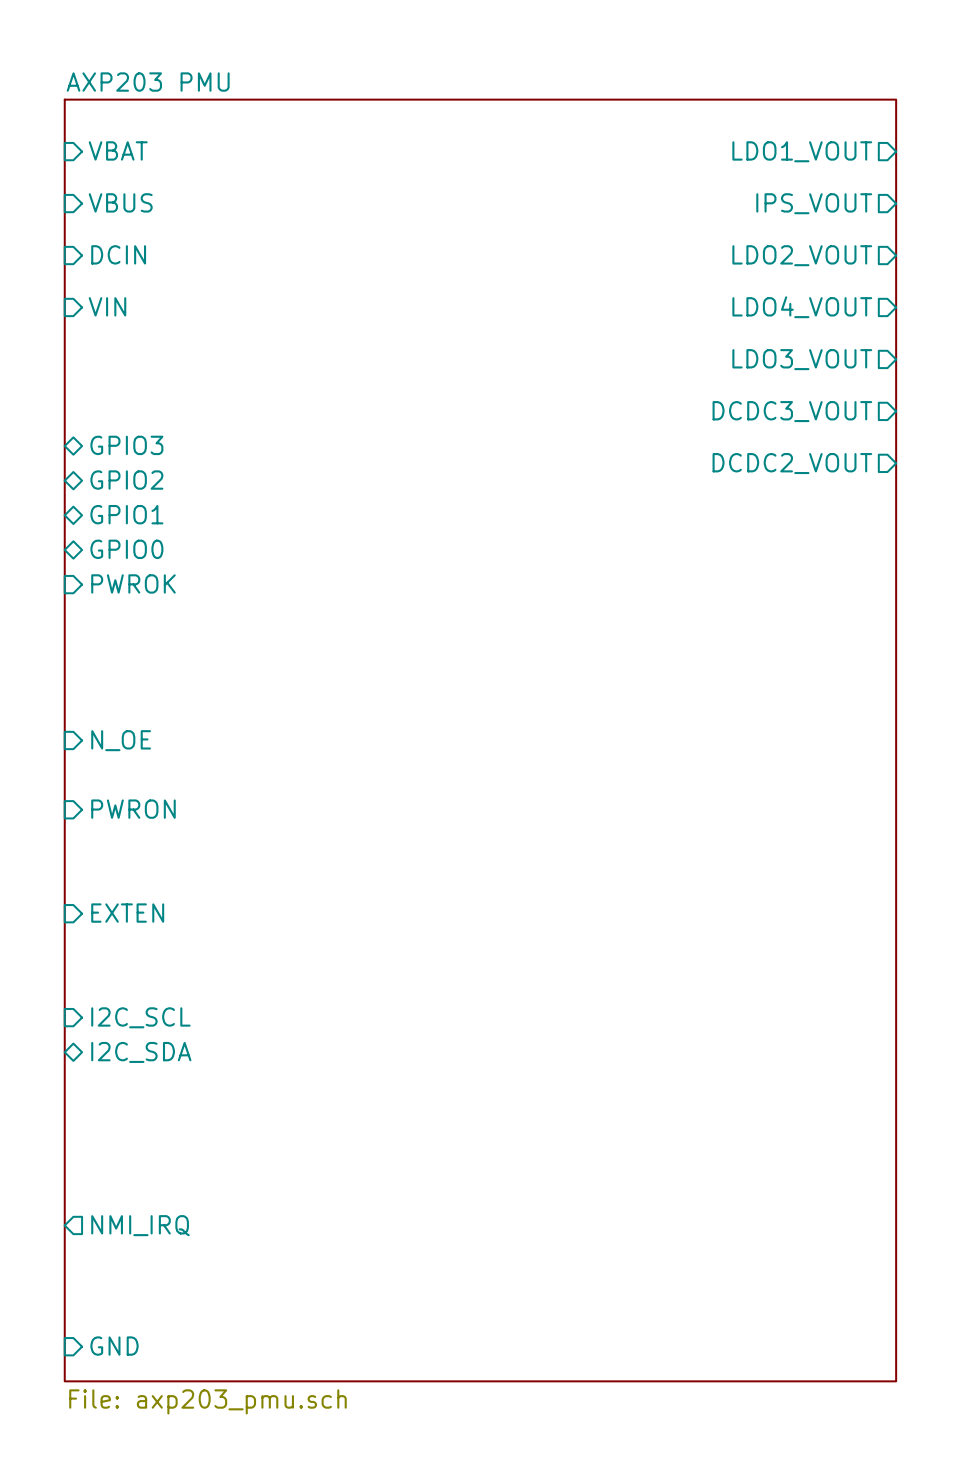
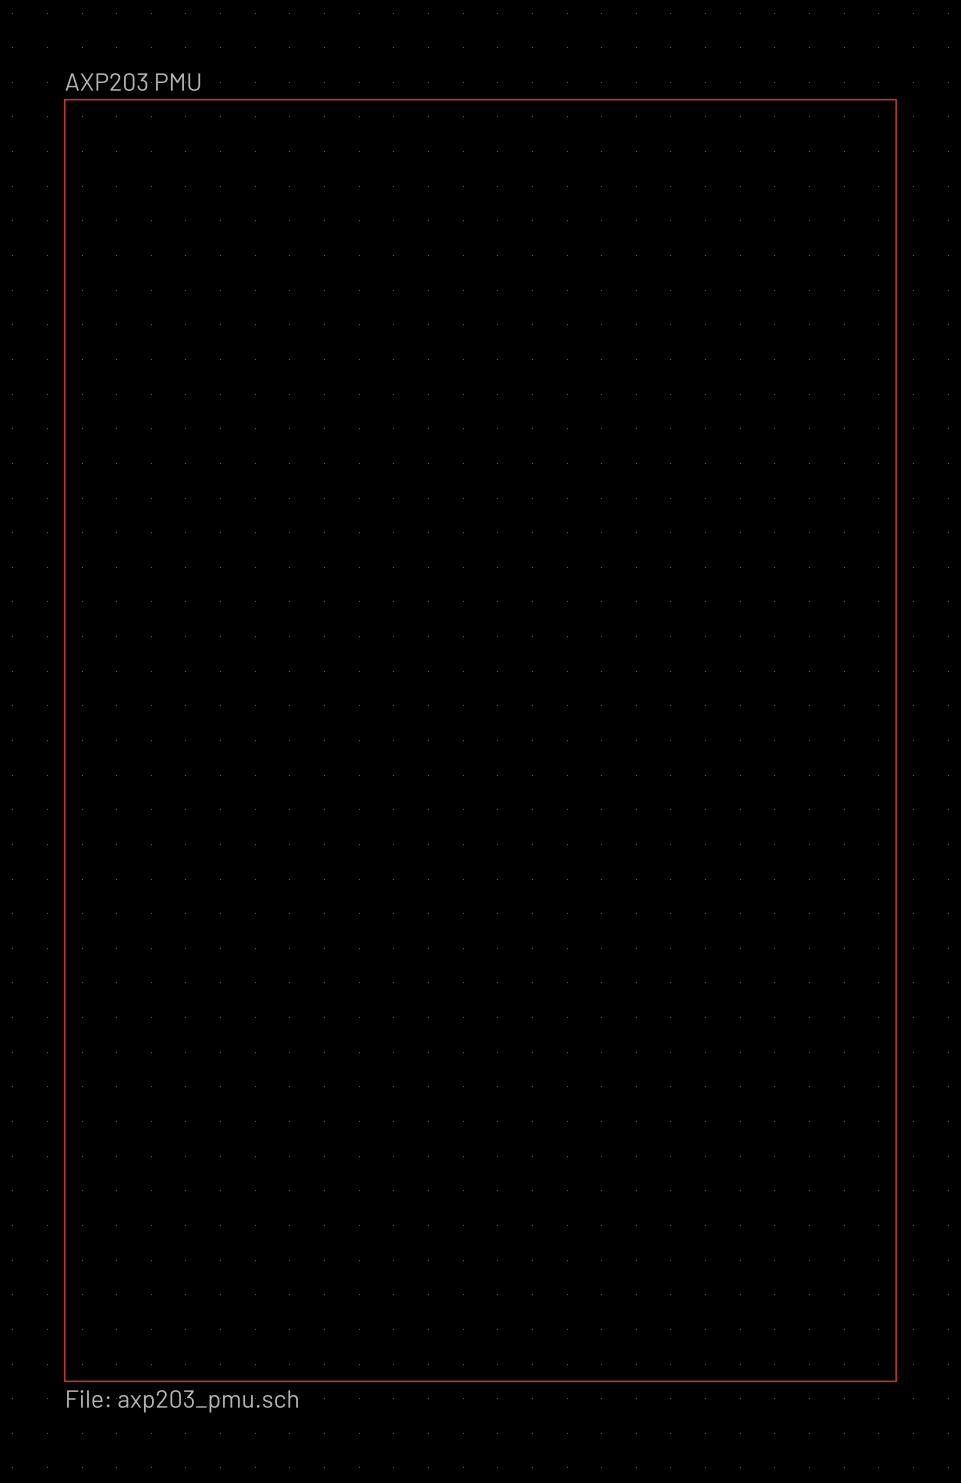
sheet pin: VBAT (118, 150) -> none
sheet pin: LDO1_VOUT (802, 151) -> none
sheet pin: VBUS (120, 202) -> none
sheet pin: IPS_VOUT (814, 203) -> none
sheet pin: DCIN (118, 254) -> none
sheet pin: LDO2_VOUT (802, 255) -> none
sheet pin: VIN (107, 306) -> none
sheet pin: LDO4_VOUT (802, 307) -> none
sheet pin: LDO3_VOUT (802, 359) -> none
sheet pin: DCDC3_VOUT (792, 411) -> none
sheet pin: GPIO3 (126, 445) -> none
sheet pin: DCDC2_VOUT (792, 463) -> none
sheet pin: GPIO2 (126, 480) -> none
sheet pin: GPIO1 (126, 514) -> none
sheet pin: GPIO0 (126, 549) -> none
sheet pin: PWROK (133, 583) -> none
sheet pin: N_OE (121, 740) -> none
sheet pin: PWRON (133, 809) -> none
sheet pin: EXTEN (127, 913) -> none
sheet pin: I2C_SCL (140, 1017) -> none
sheet pin: I2C_SDA (141, 1052) -> none
sheet pin: NMI_IRQ (140, 1225) -> none
sheet pin: GND (114, 1346) -> none

